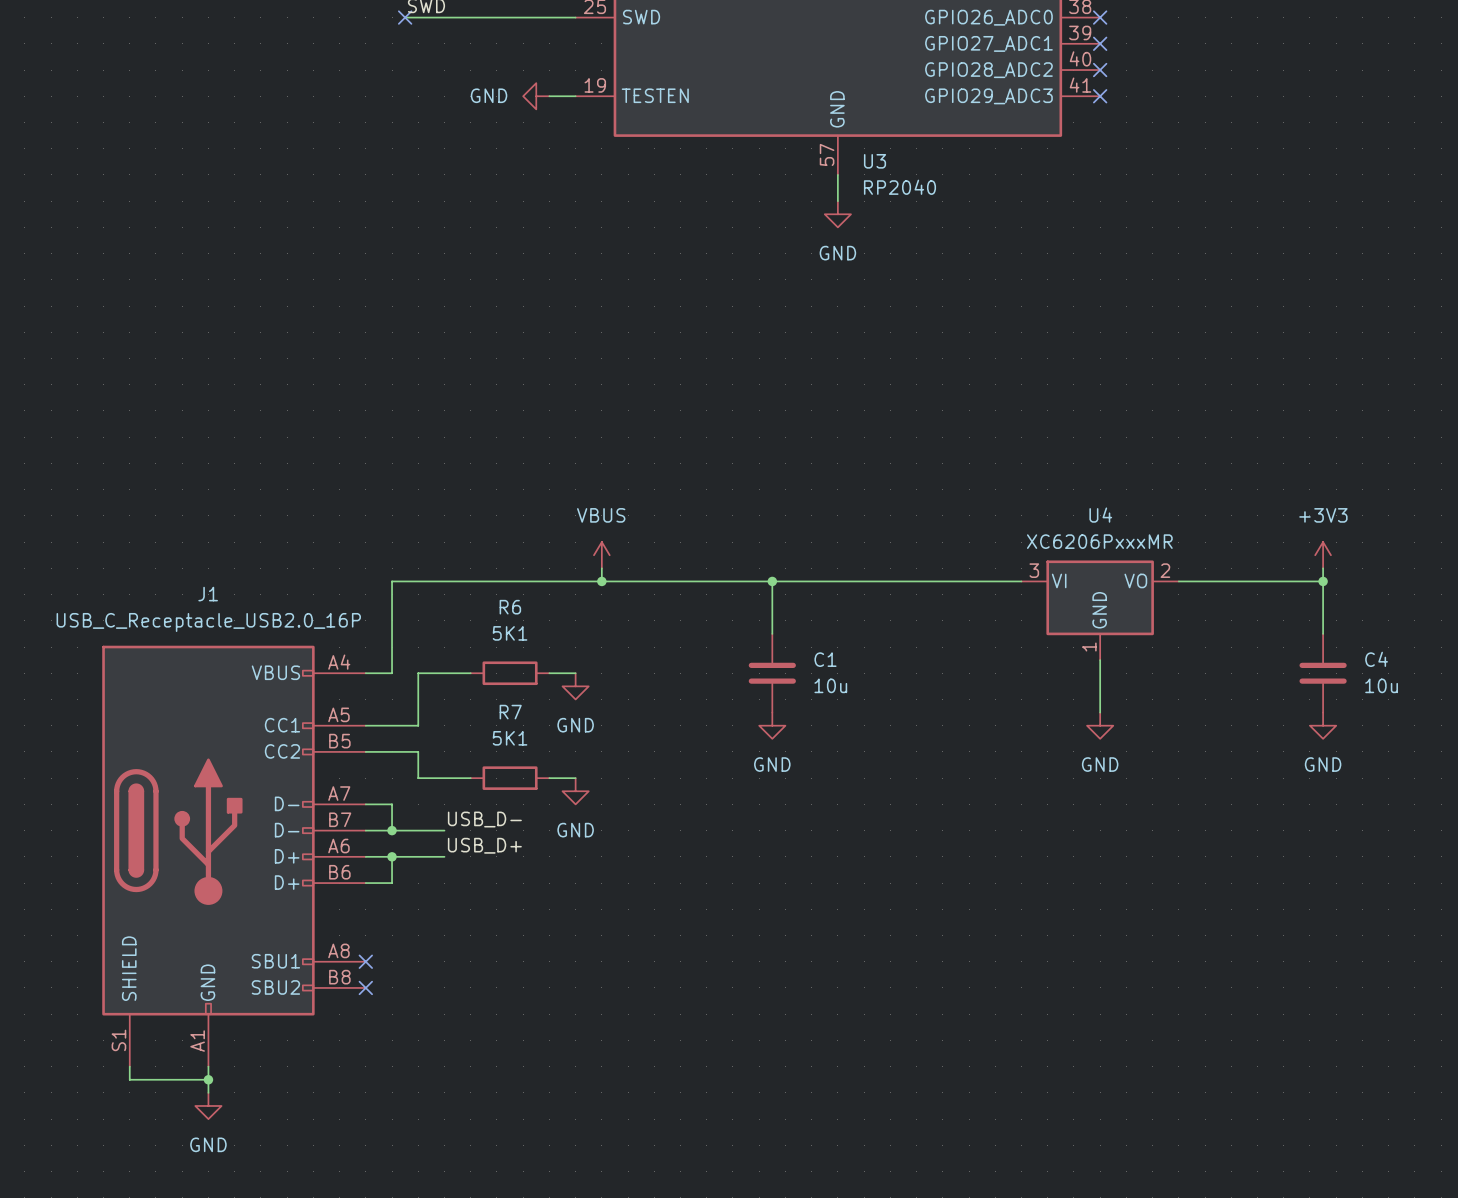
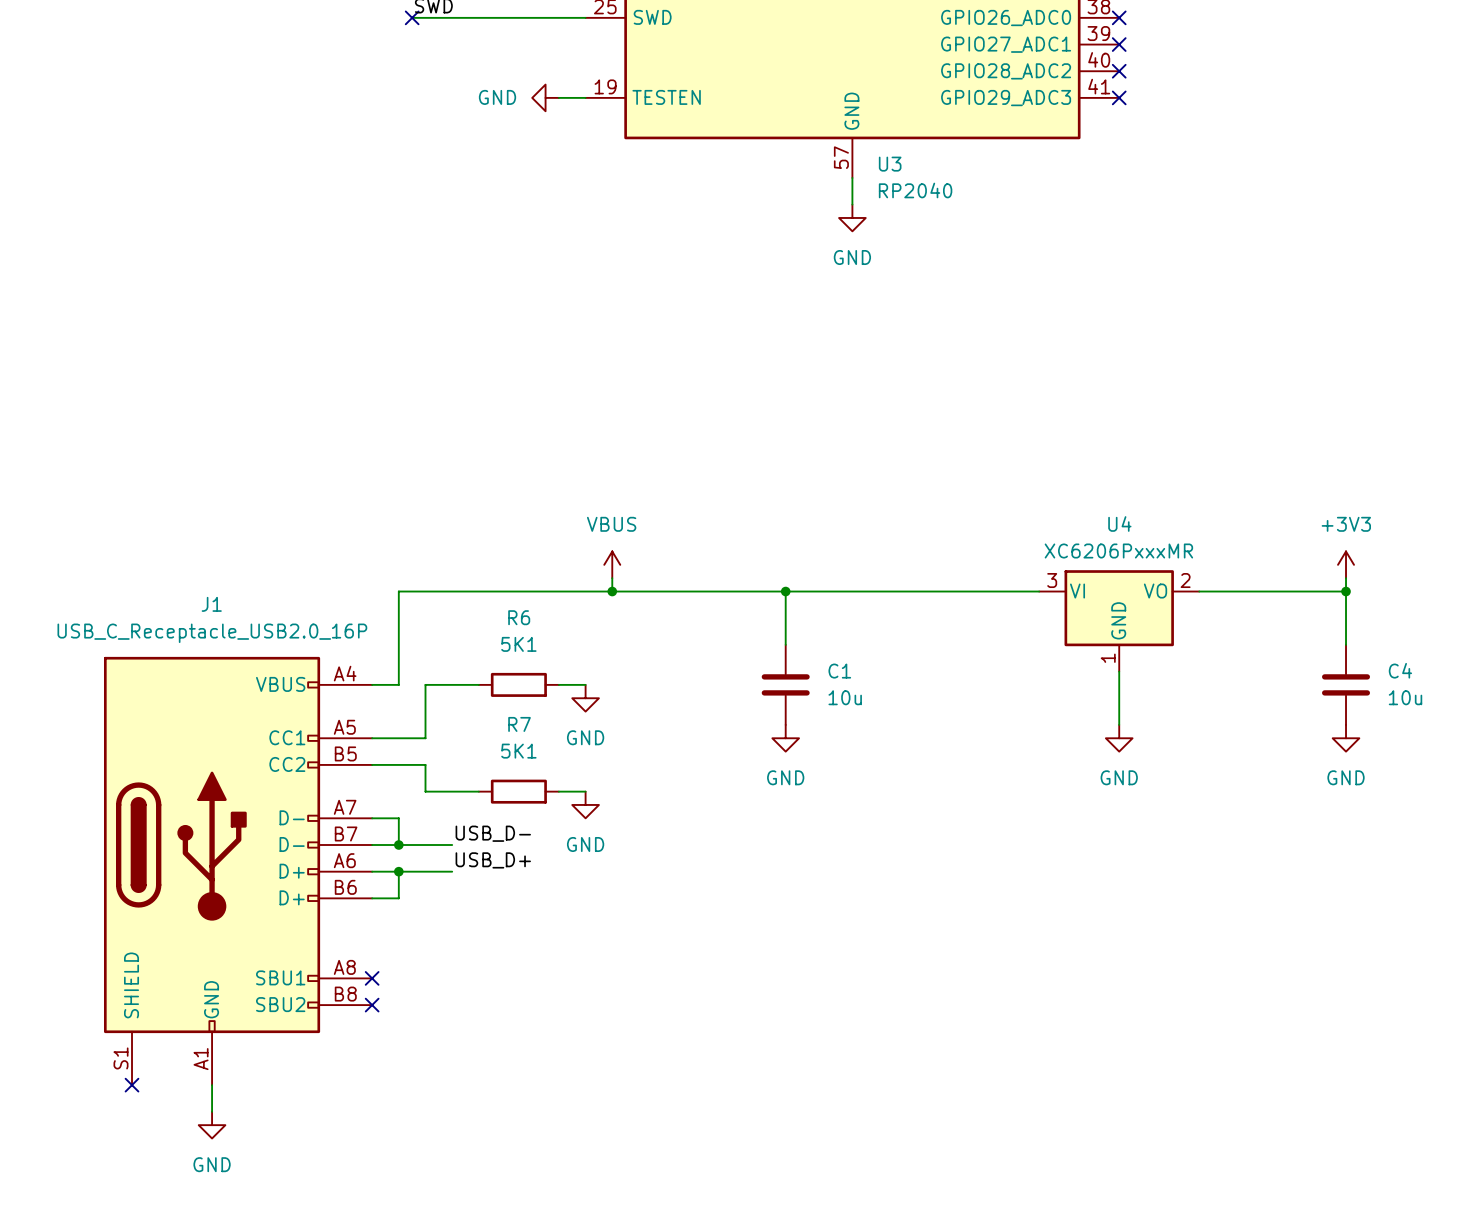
wire: (129, 1066) (129, 1079) (208, 1079) -> none
no-connect mark: none -> (132, 1085)
junction: (208, 1079) -> none

